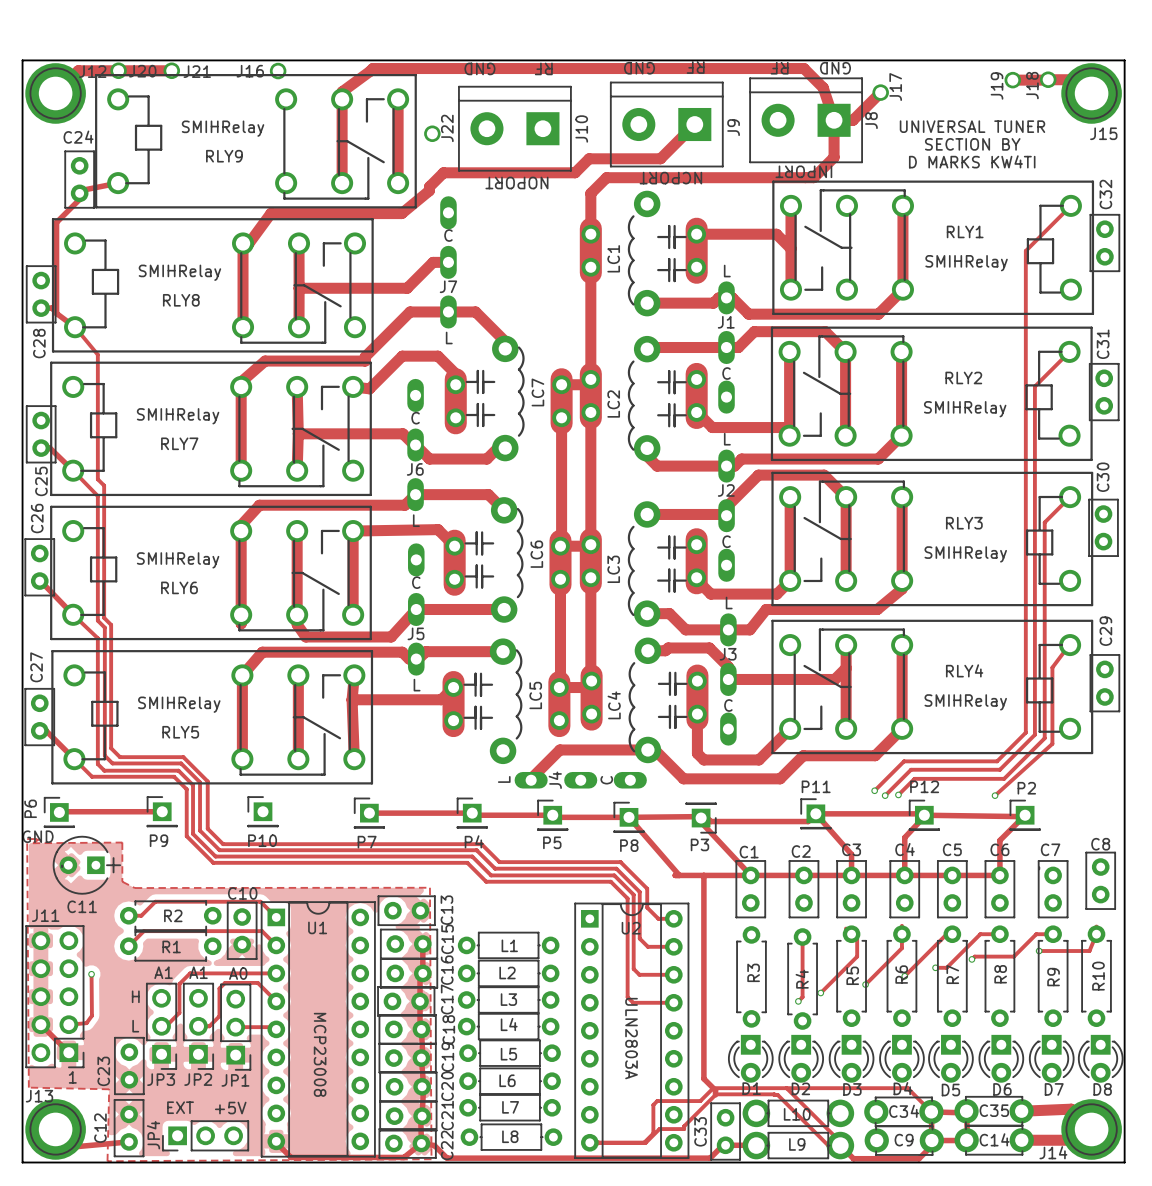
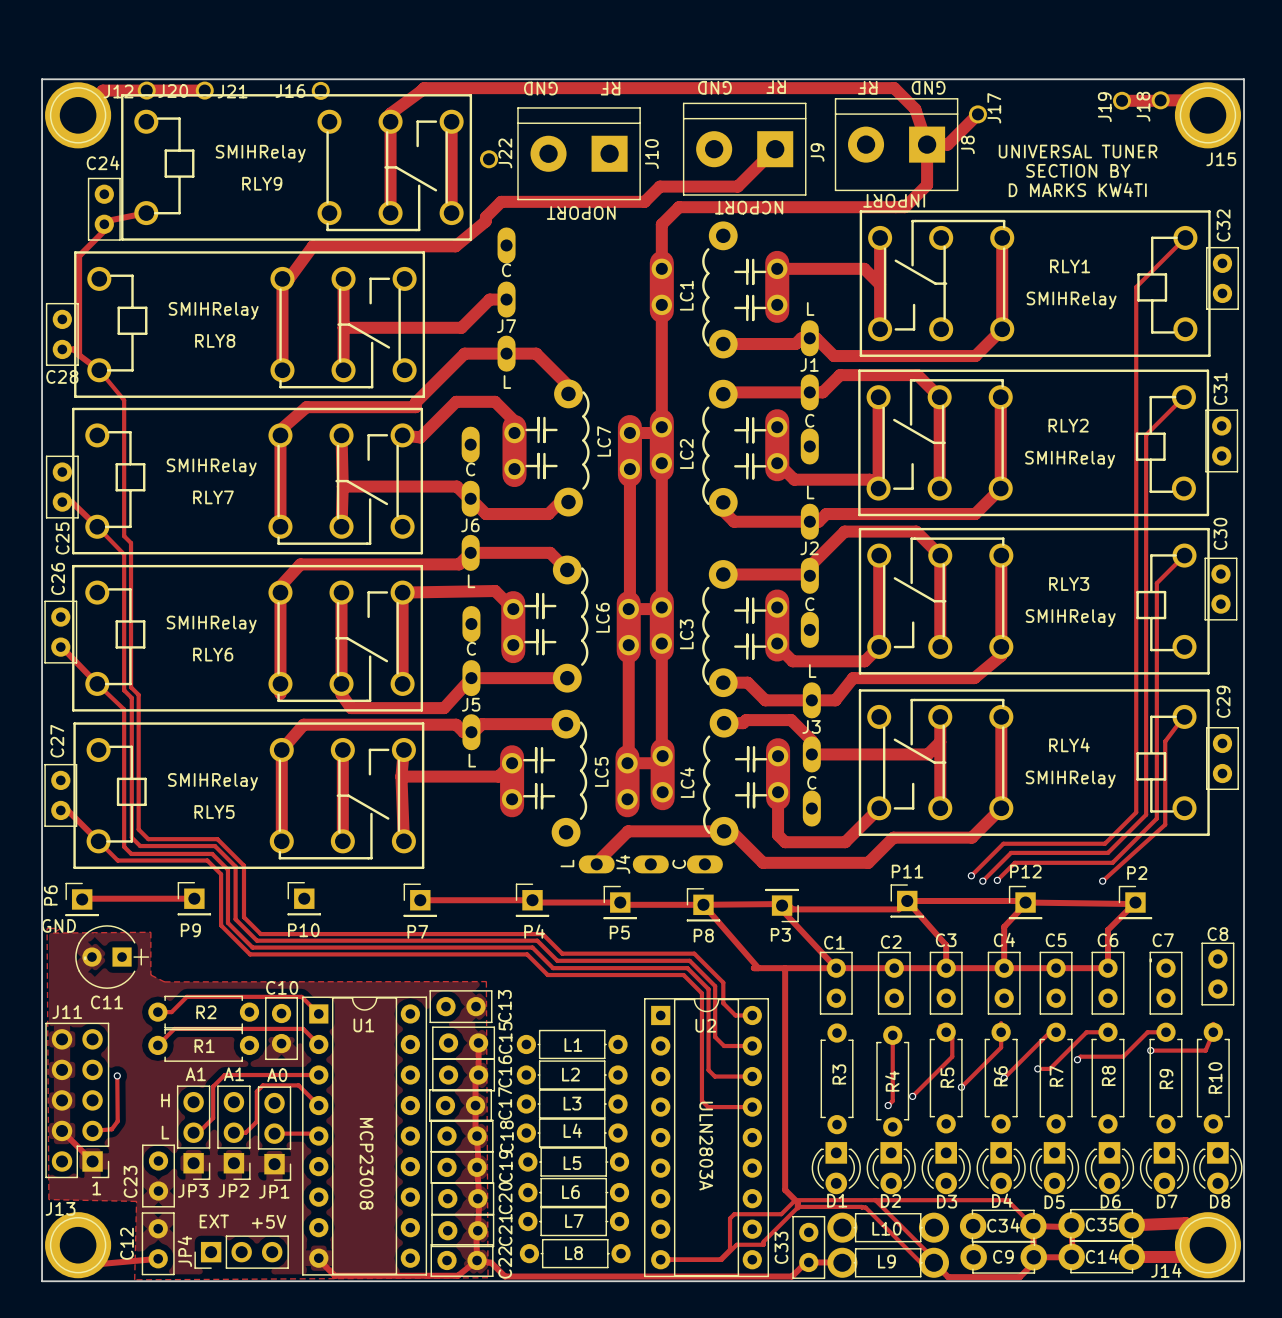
C28 name rotation: 0° (39, 343) -> 90° clockwise (62, 376)

